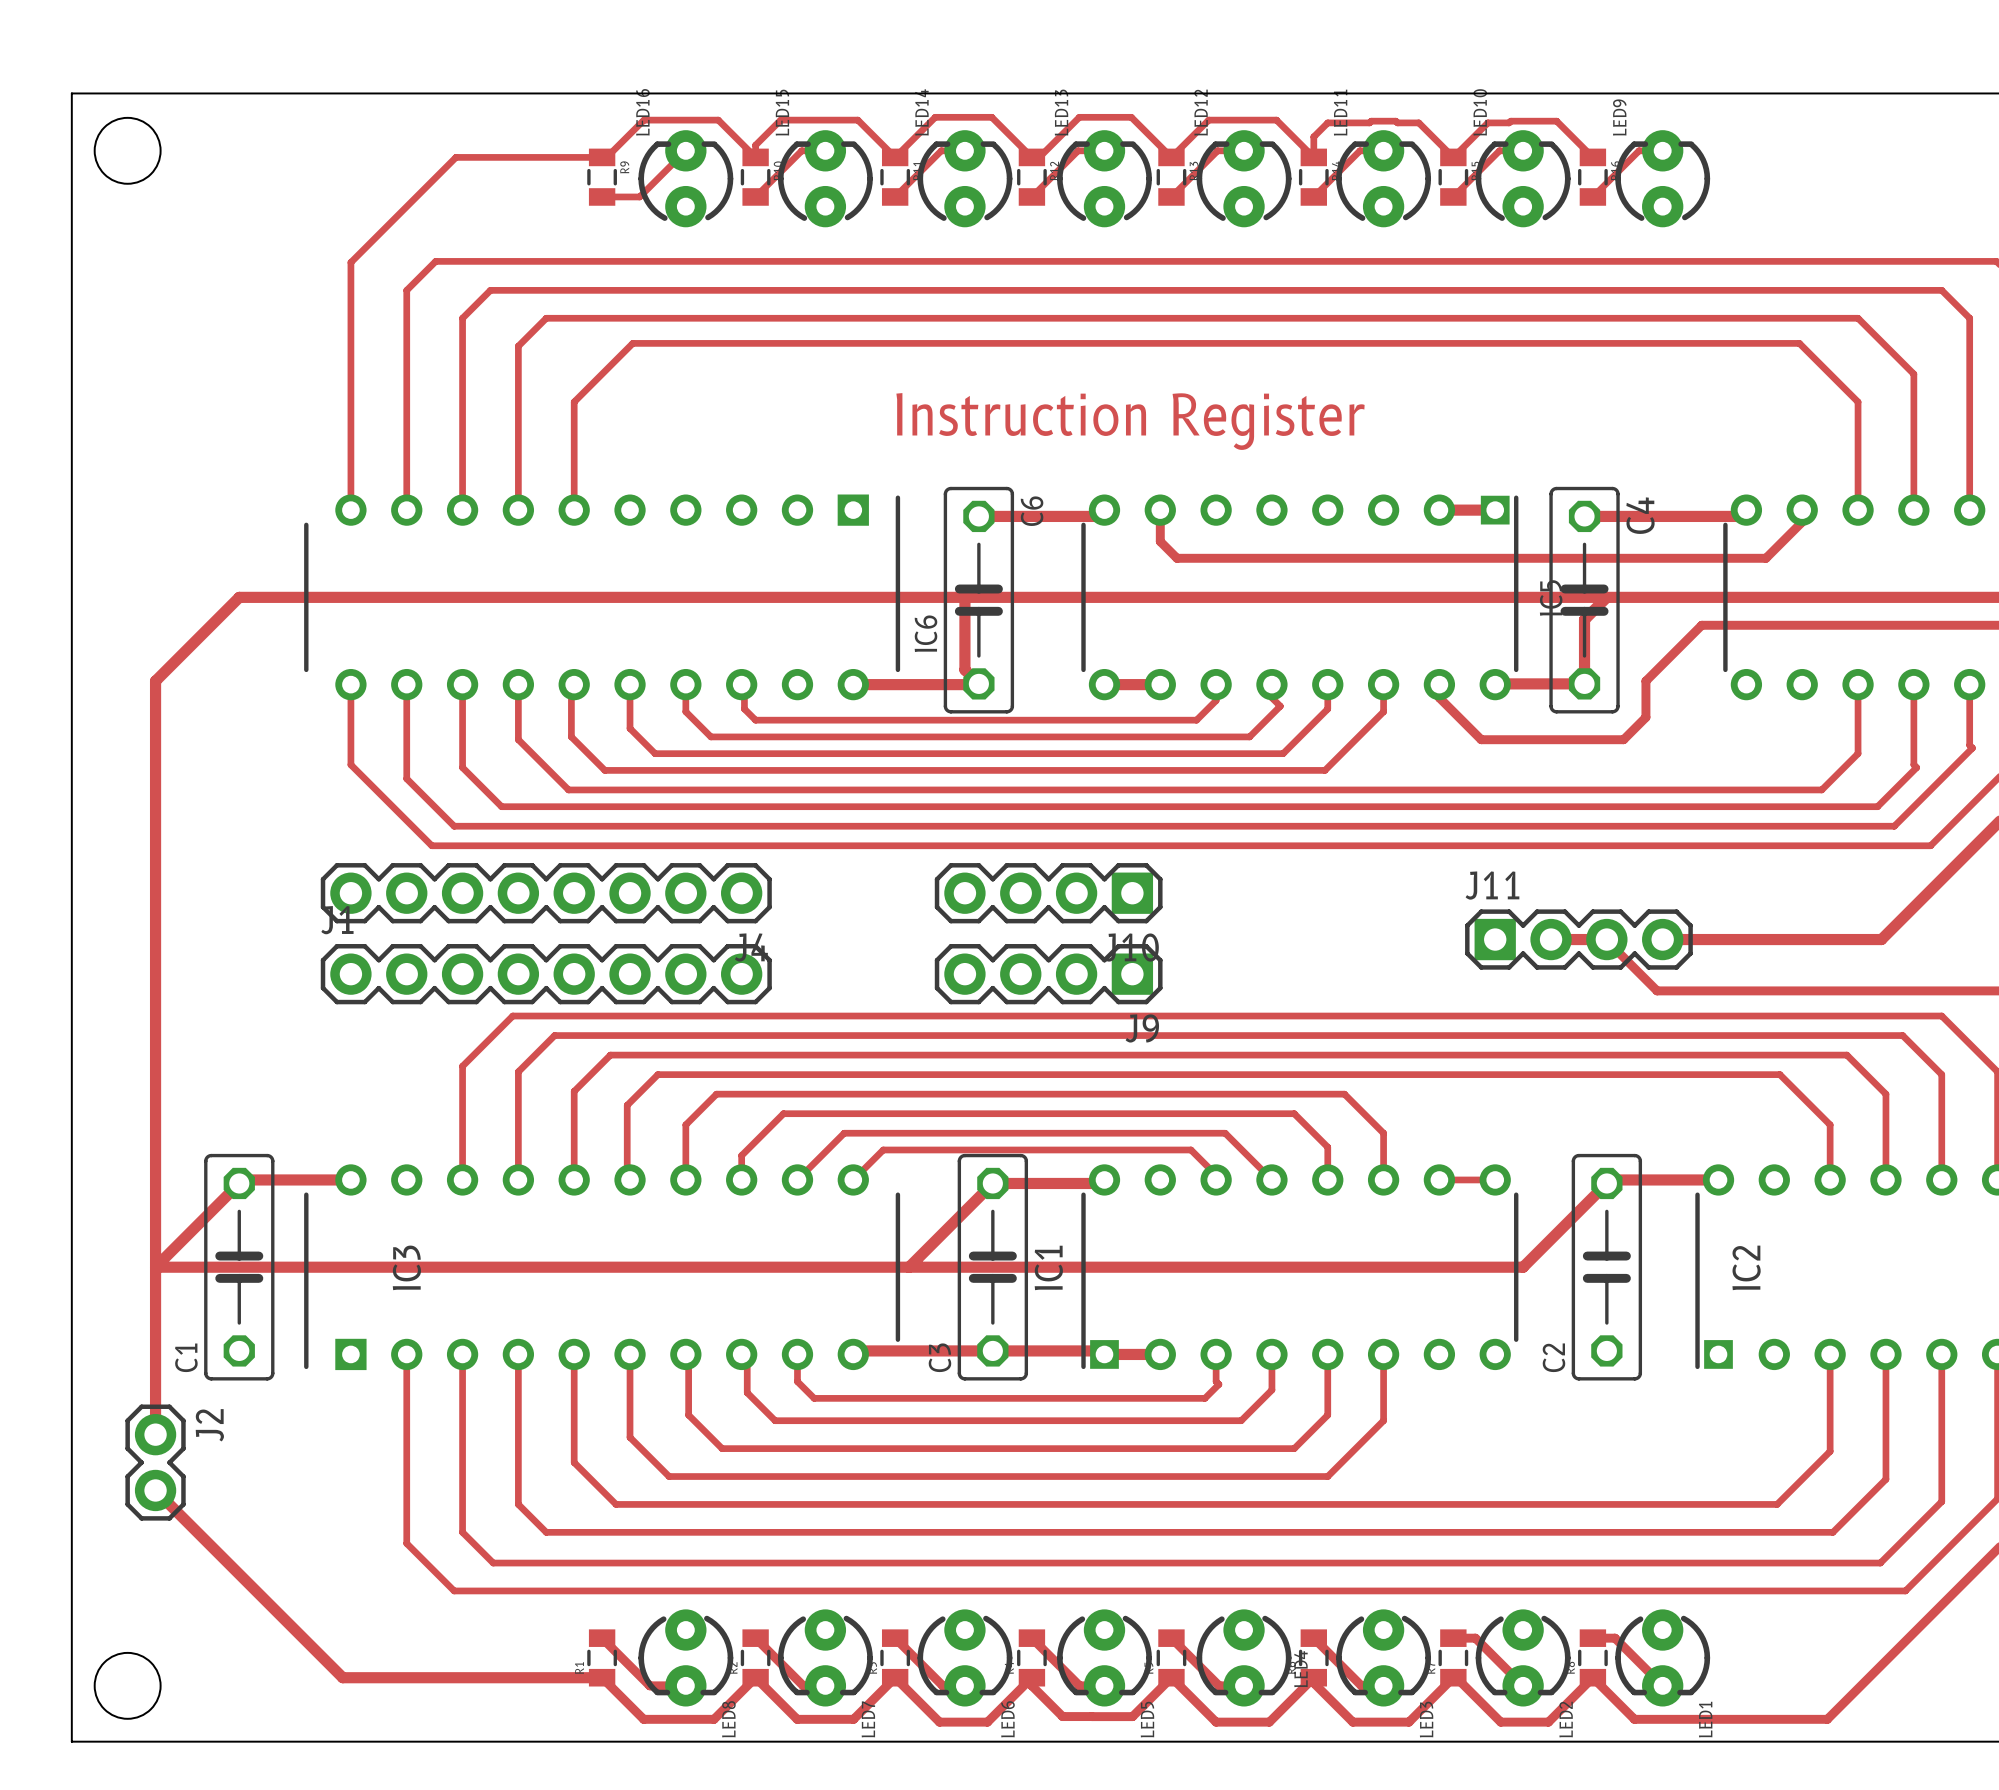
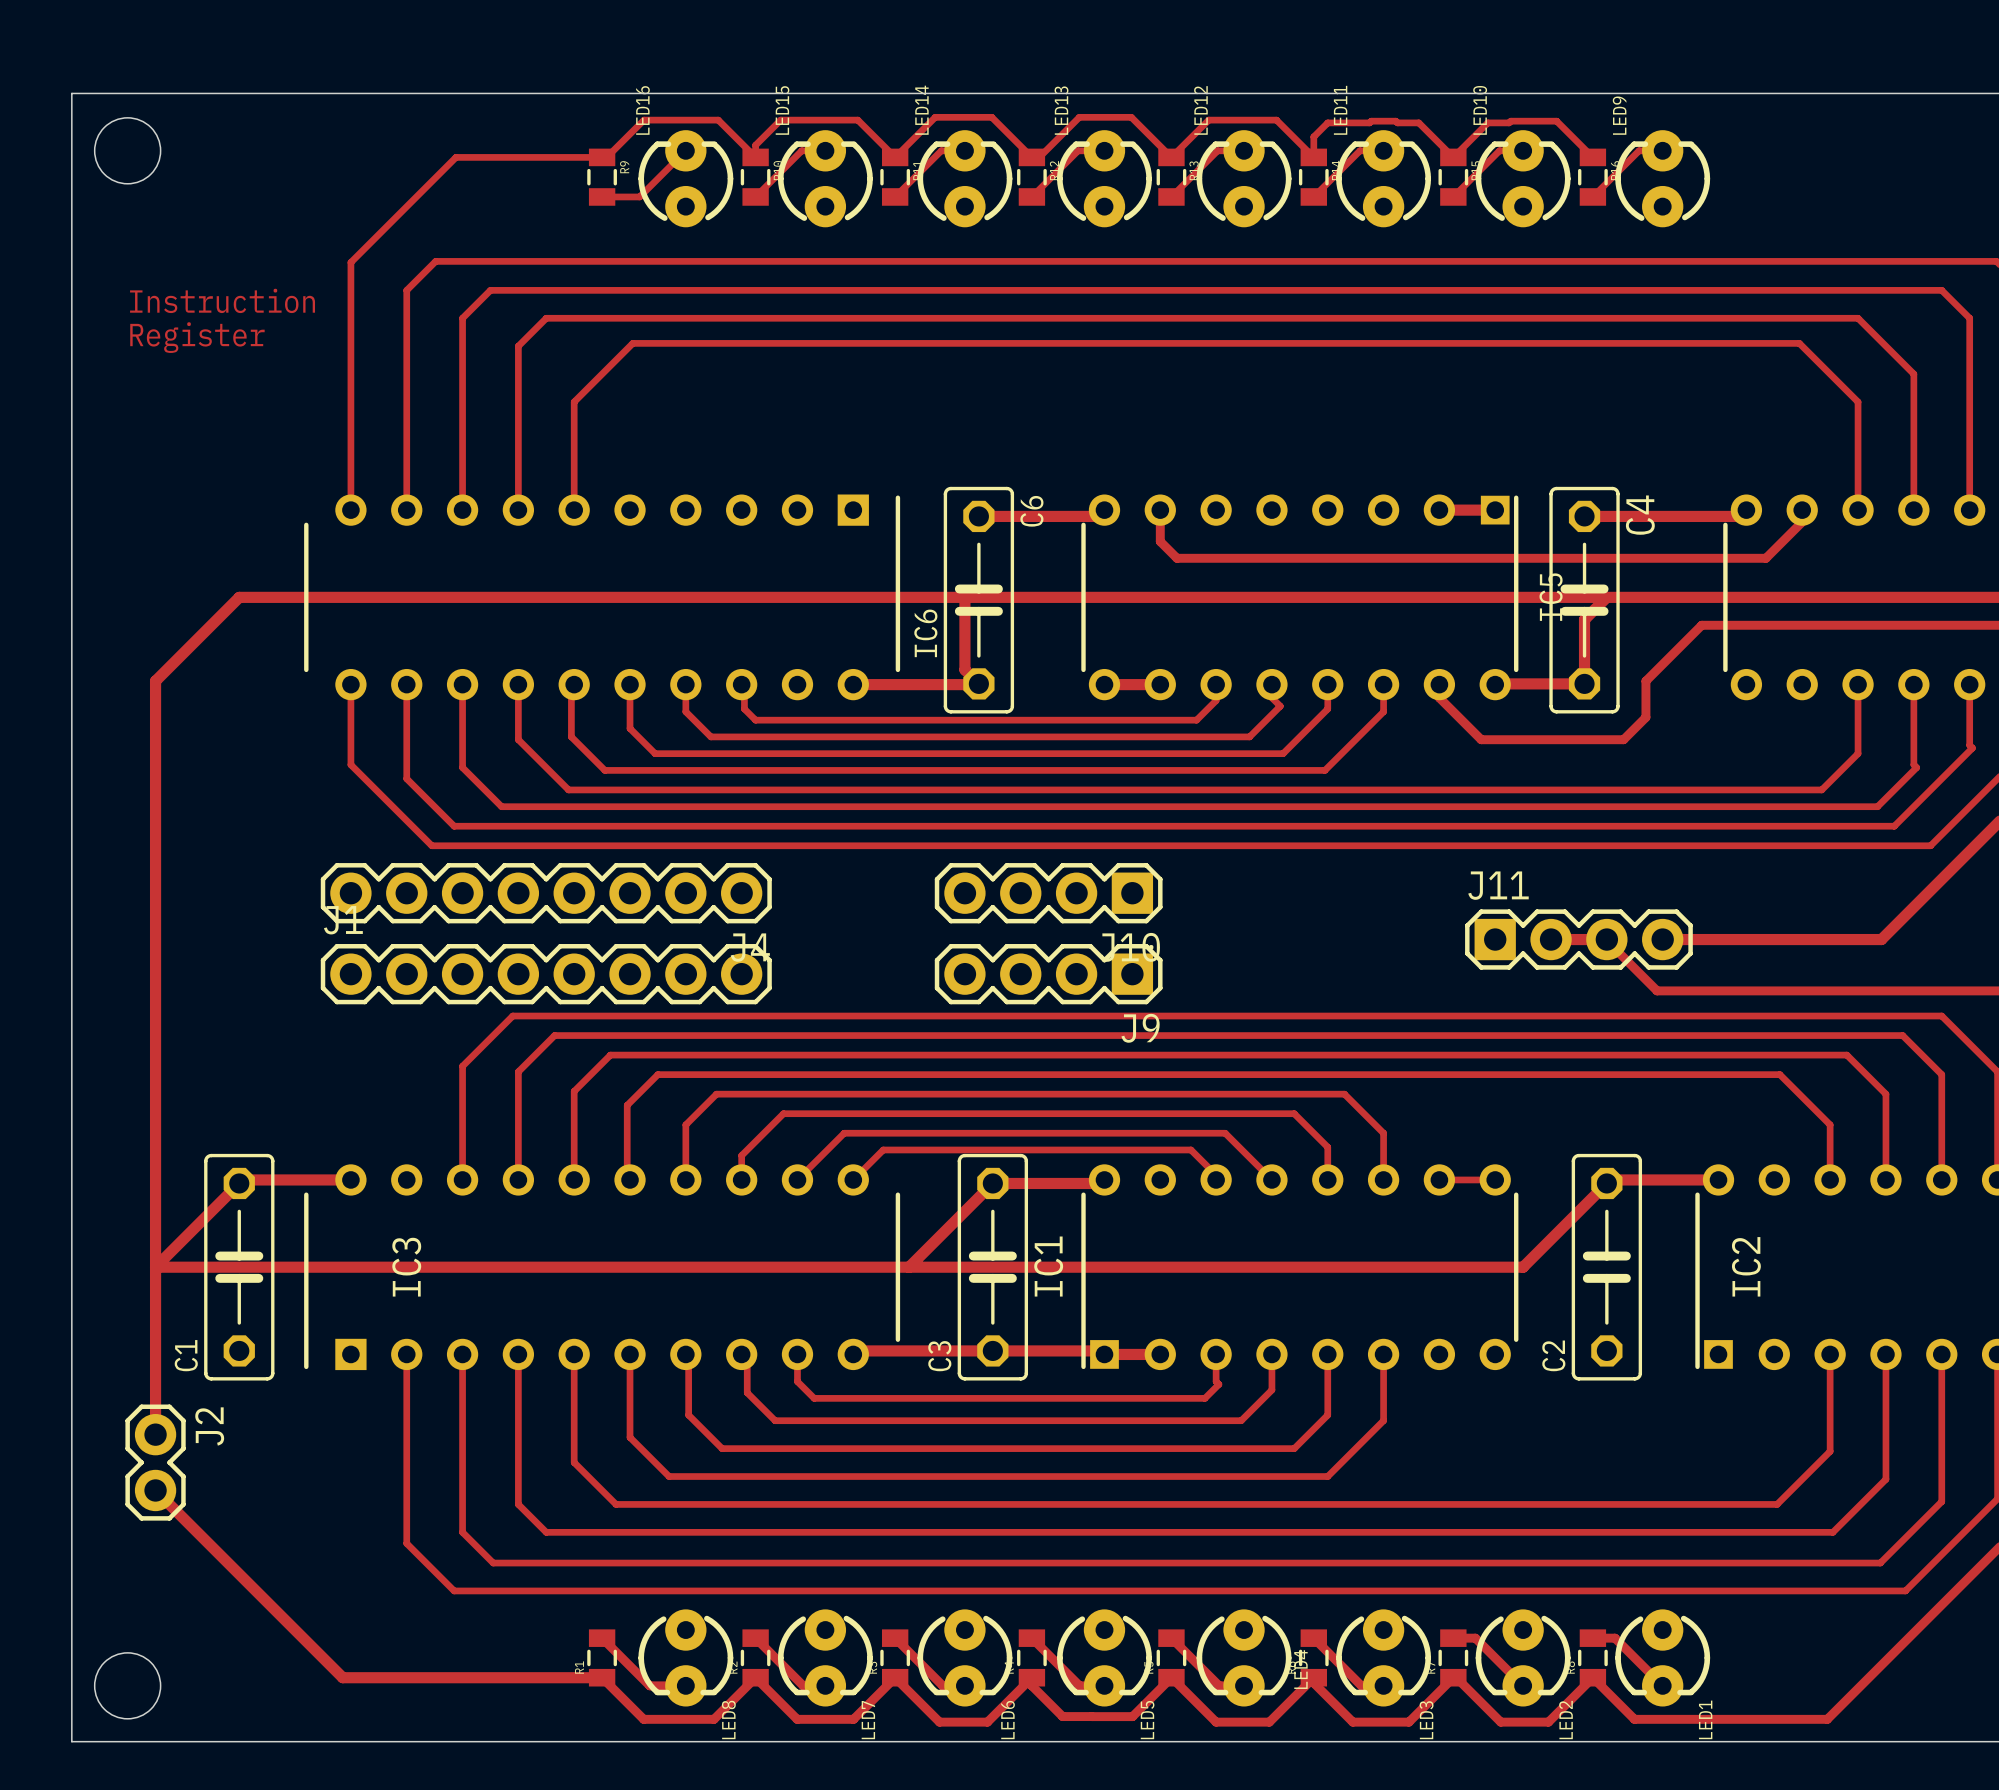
text: none -> Instruction (222, 300)
text: none -> Register (197, 337)
text: Instruction Register (1130, 421) -> none

